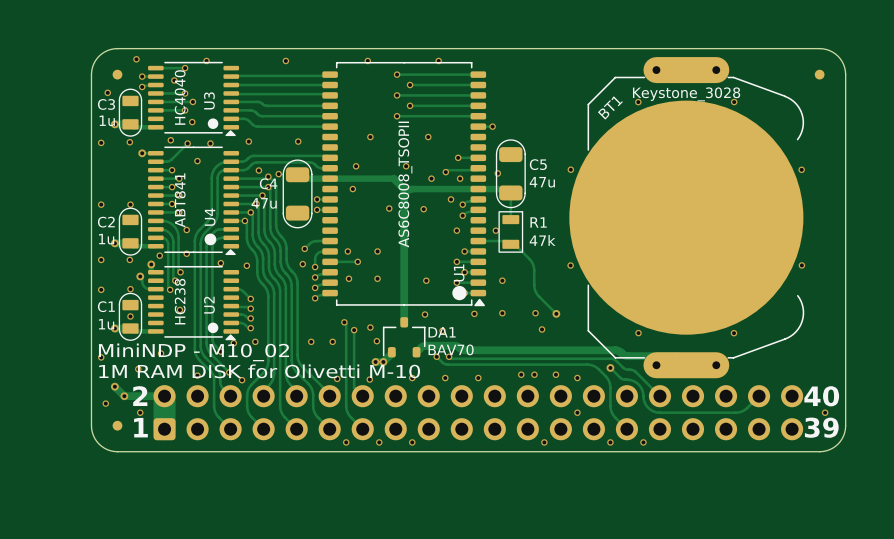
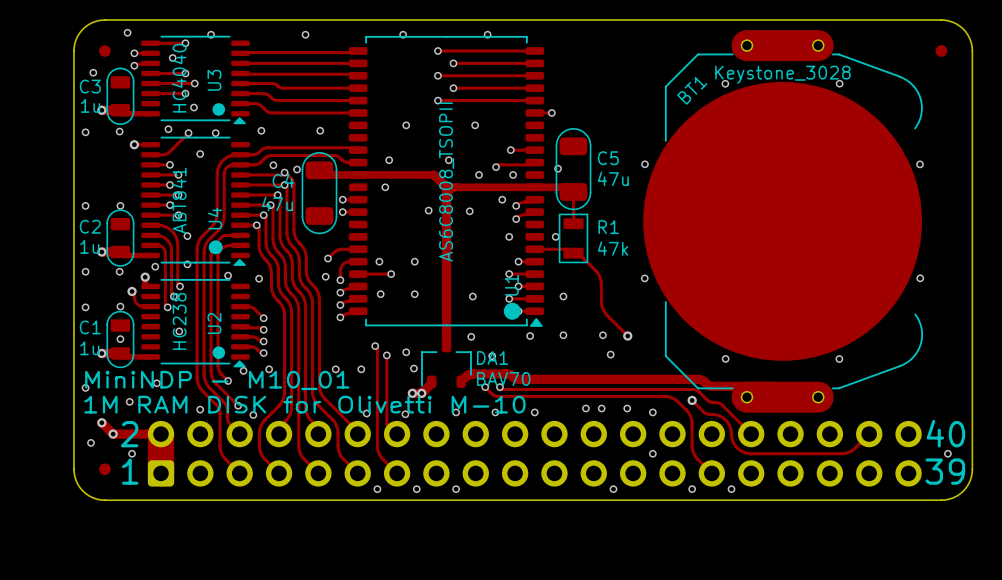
text: MiniNDP - M10_02 (193, 352) -> MiniNDP - M10_01 (217, 380)

